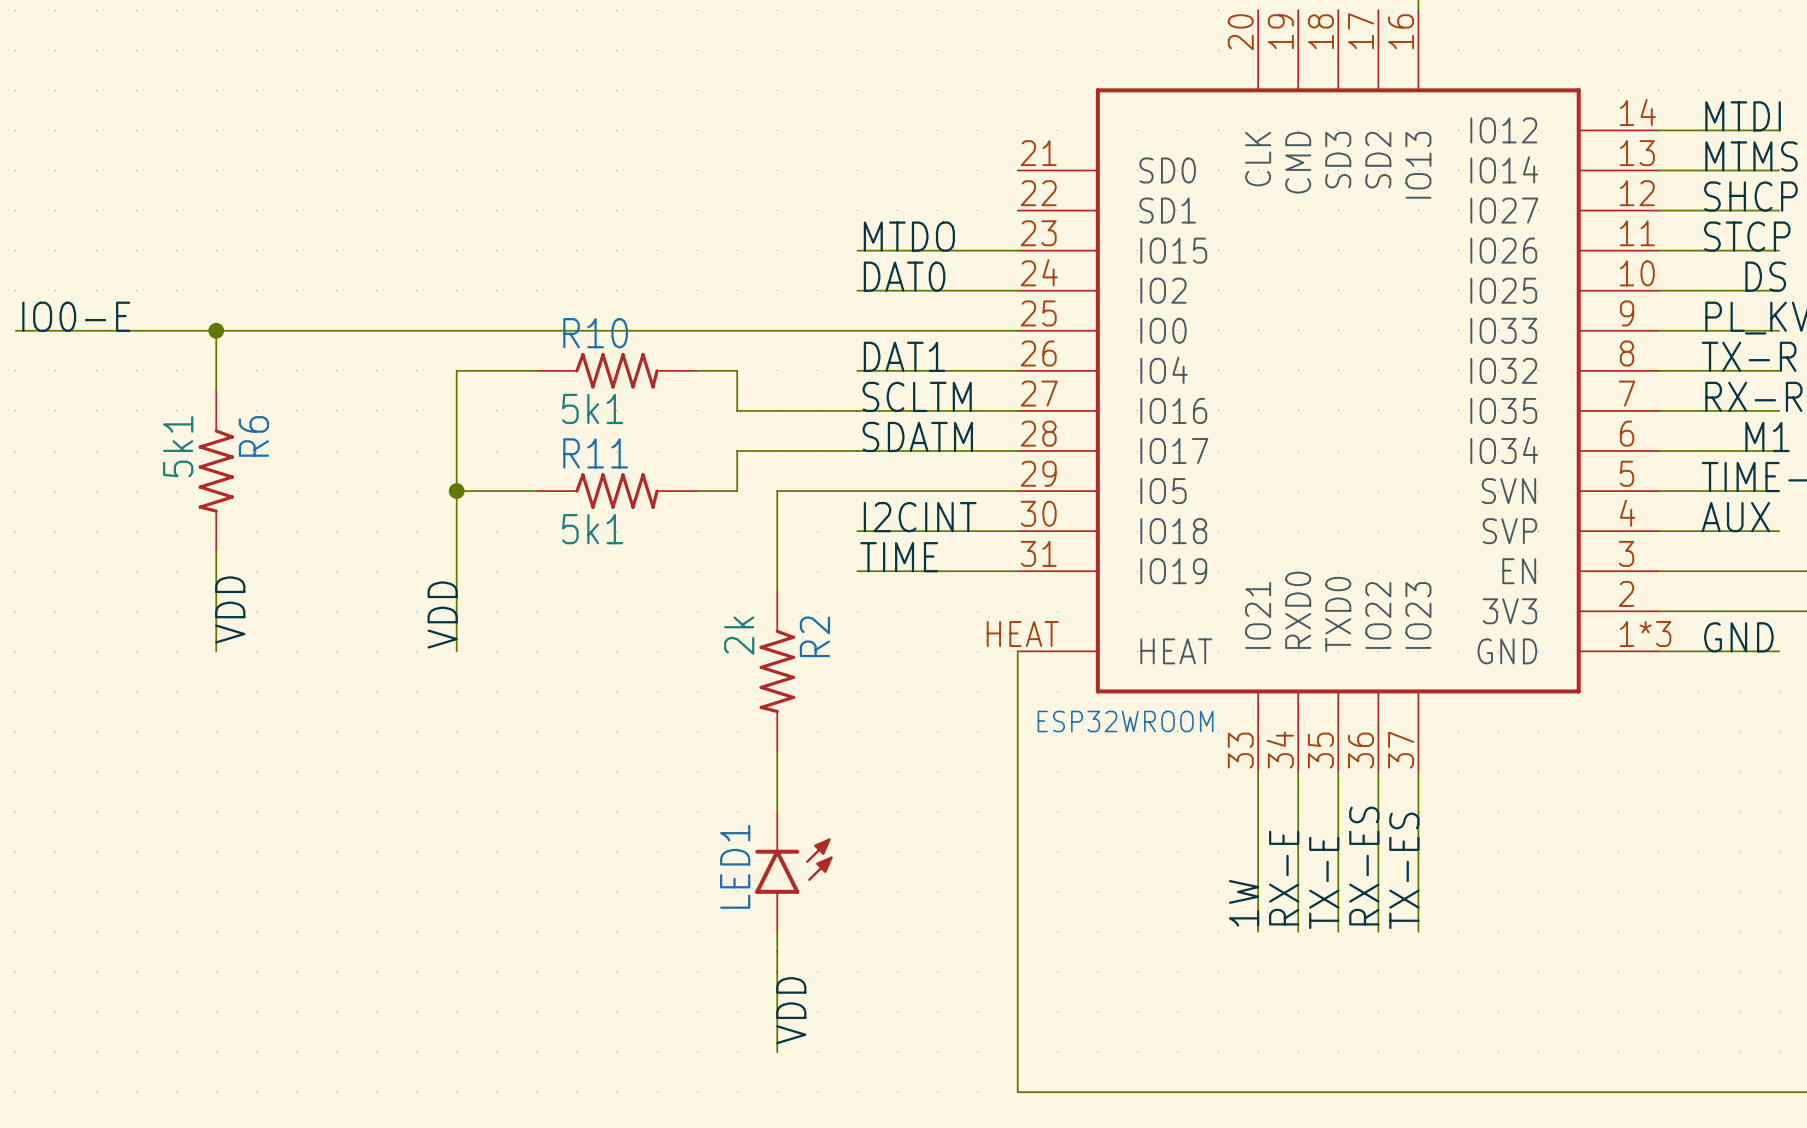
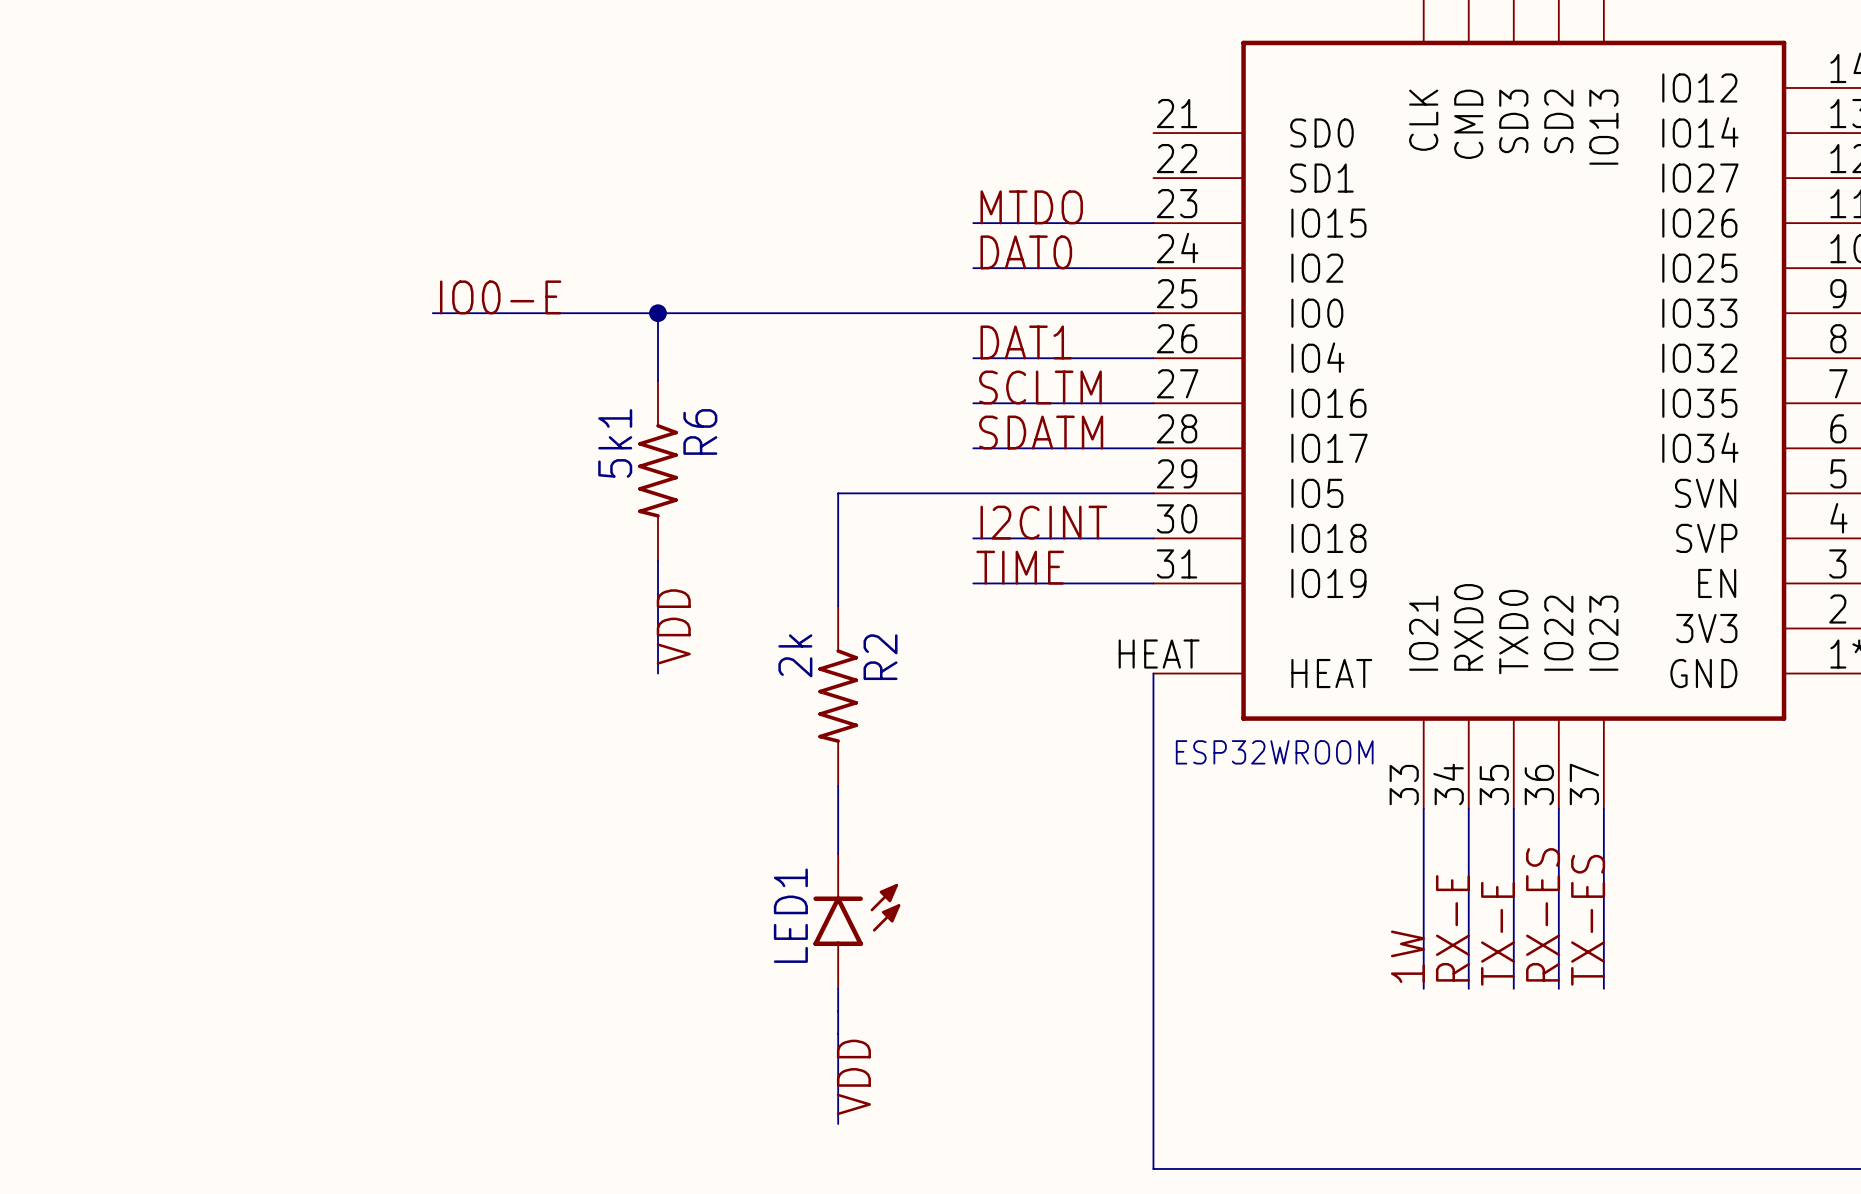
label position: IO0-E (76, 316) -> IO0-E (500, 297)
wire: (15, 330) (376, 330) -> none
wire: (216, 330) (216, 390) -> (658, 313) (658, 380)
junction: (216, 330) -> none
junction: none -> (658, 313)
wire: (536, 370) (456, 370) (456, 651) -> none
R10: 5k1 (616, 370) -> none
wire: (697, 370) (737, 370) (737, 410) (857, 410) -> none
wire: (857, 451) (737, 451) (737, 491) (697, 491) -> none
R6 position: (216, 471) -> (658, 470)
wire: (456, 491) (536, 491) -> none
junction: (456, 491) -> none
R11: 5k1 (616, 491) -> none
wire: (777, 491) (777, 591) -> (883, 493) (838, 493) (838, 605)
wire: (216, 551) (216, 651) -> (658, 560) (658, 673)
label: VDD (230, 609) -> none
label position: VDD (442, 615) -> VDD (673, 627)
R2 position: (777, 671) -> (838, 696)
wire: (777, 751) (777, 811) -> (838, 786) (838, 853)
LED1 position: (793, 871) -> (856, 921)
wire: (777, 931) (777, 1052) -> (838, 988) (838, 1123)
label position: VDD (791, 1010) -> VDD (853, 1077)

